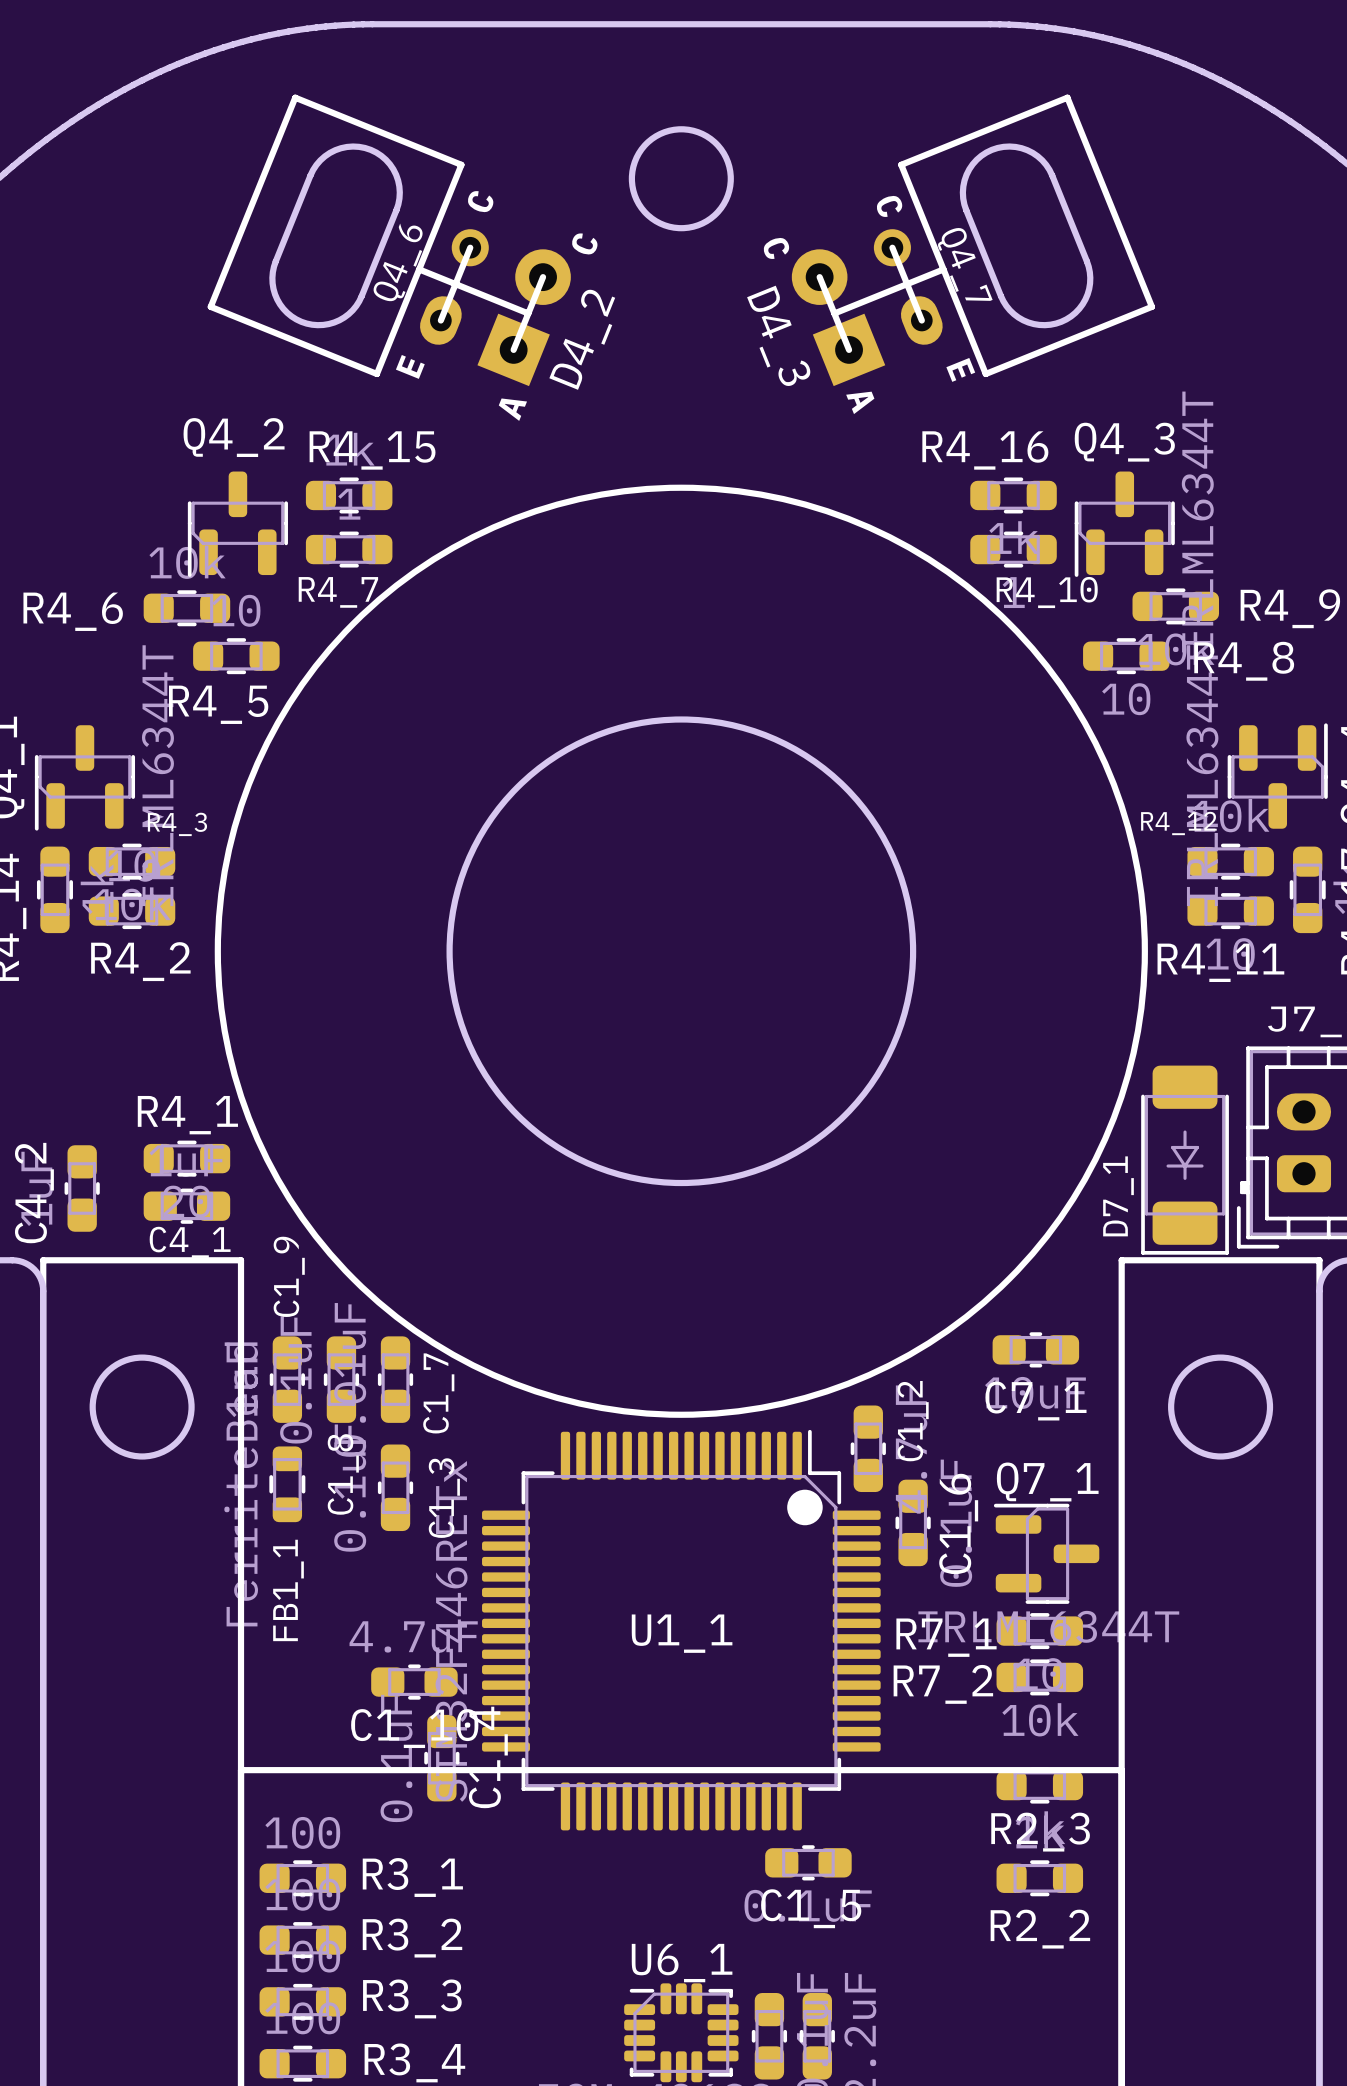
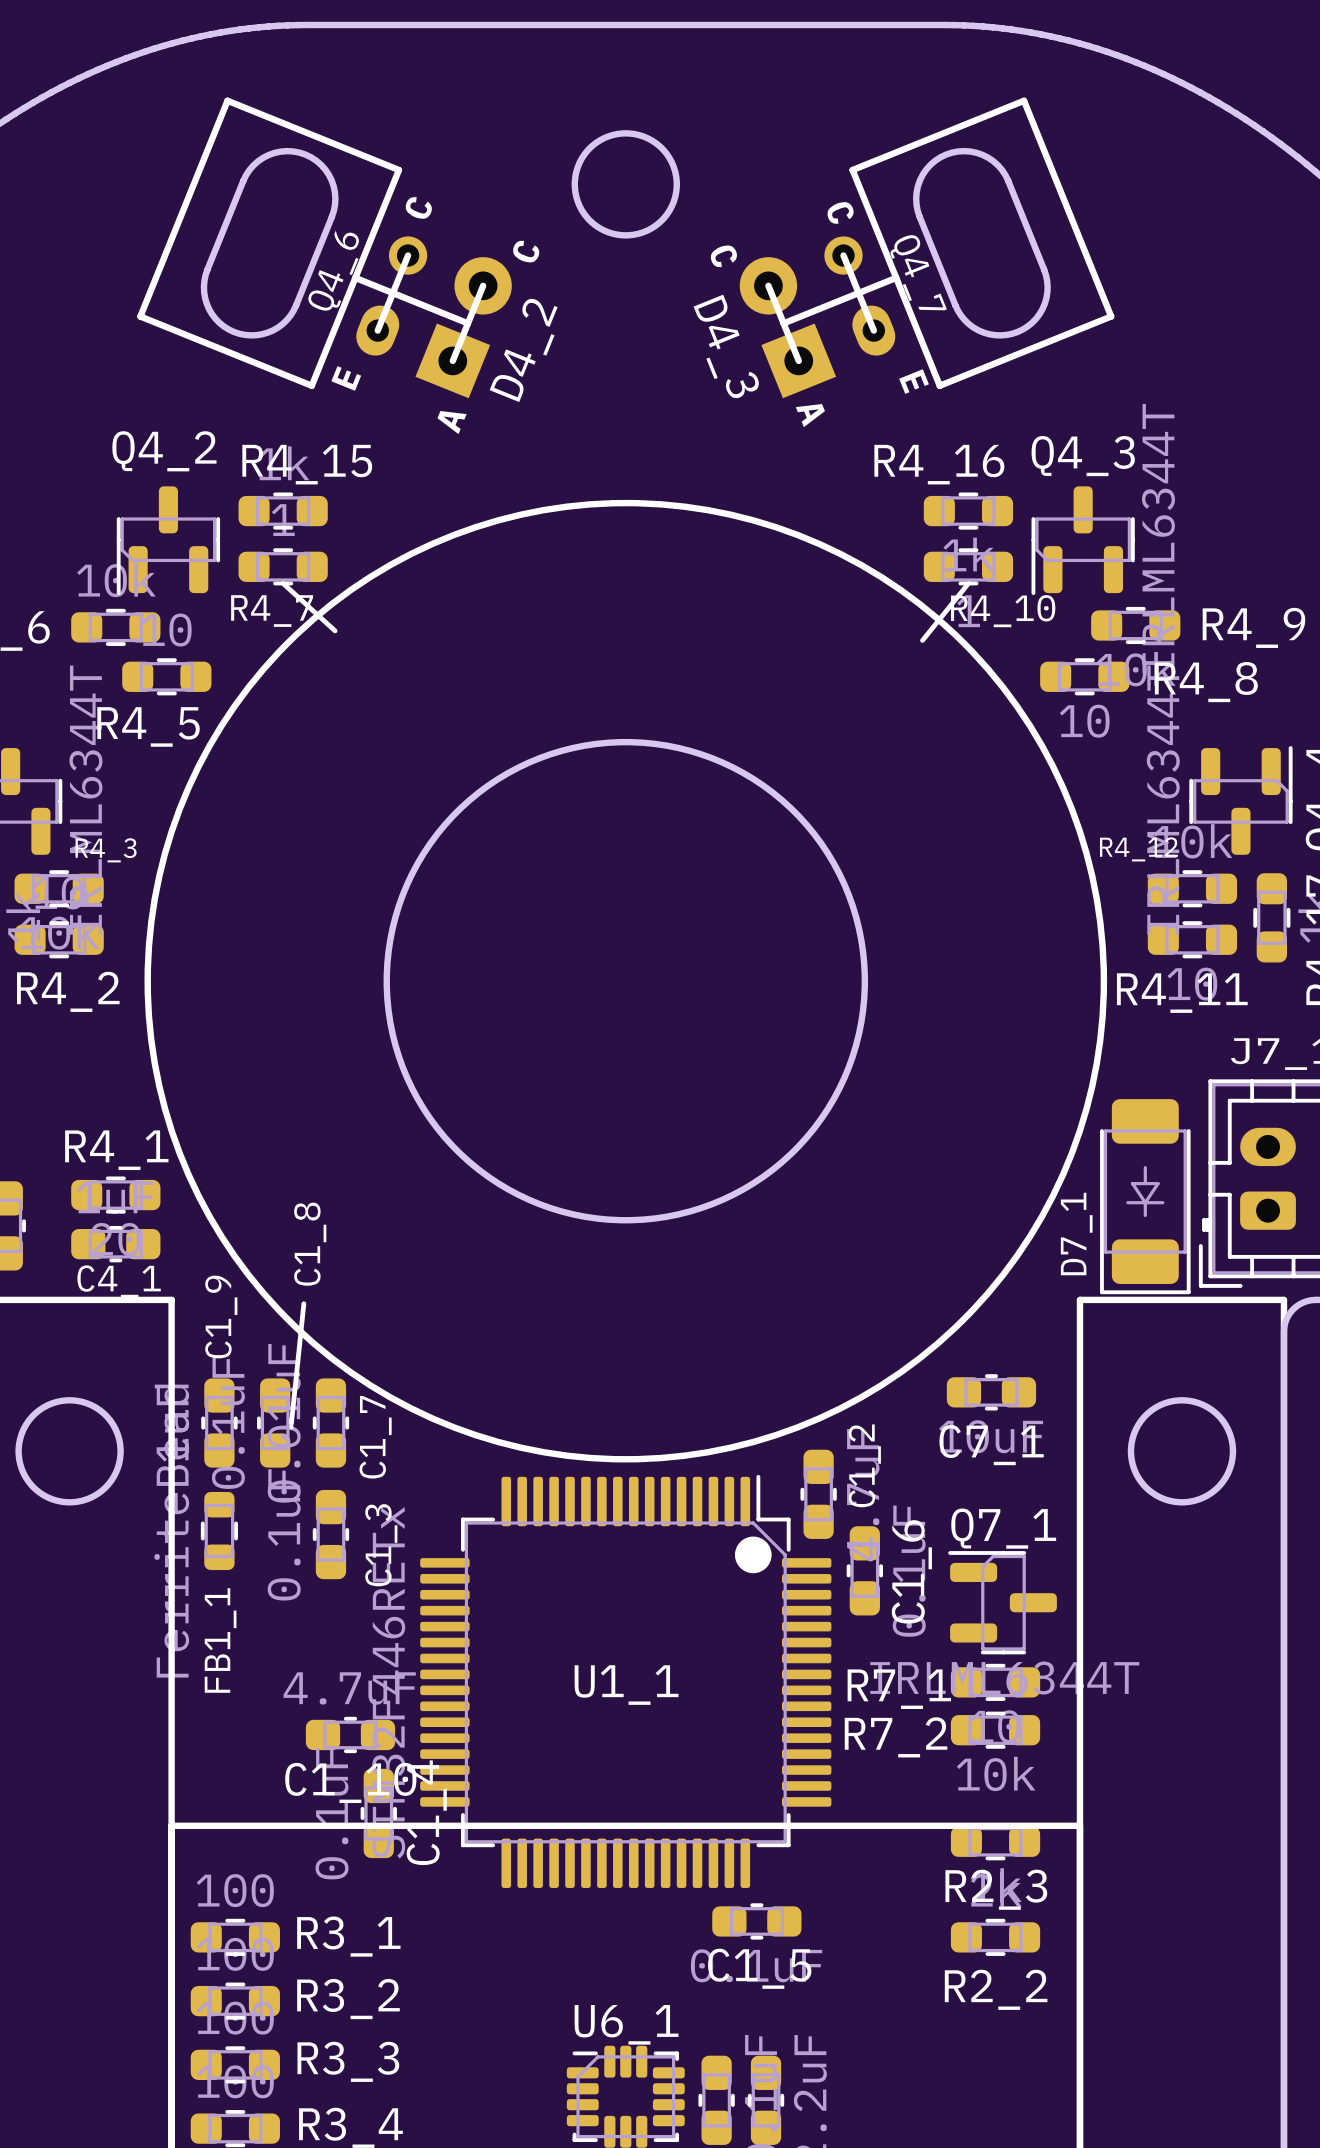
line: none -> (283, 583) (335, 630)
line: none -> (968, 583) (922, 640)
line: none -> (303, 1303) (291, 1423)
C1_8 name position: C1_8 (343, 1474) -> C1_8 (310, 1244)

